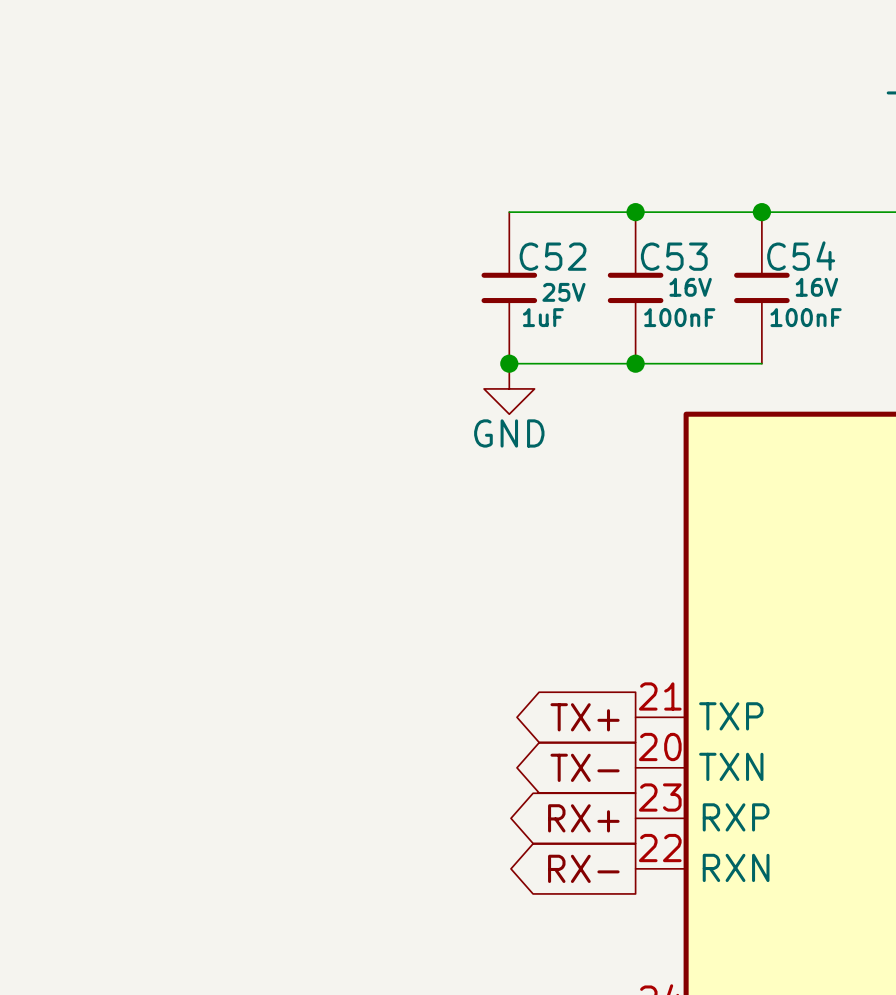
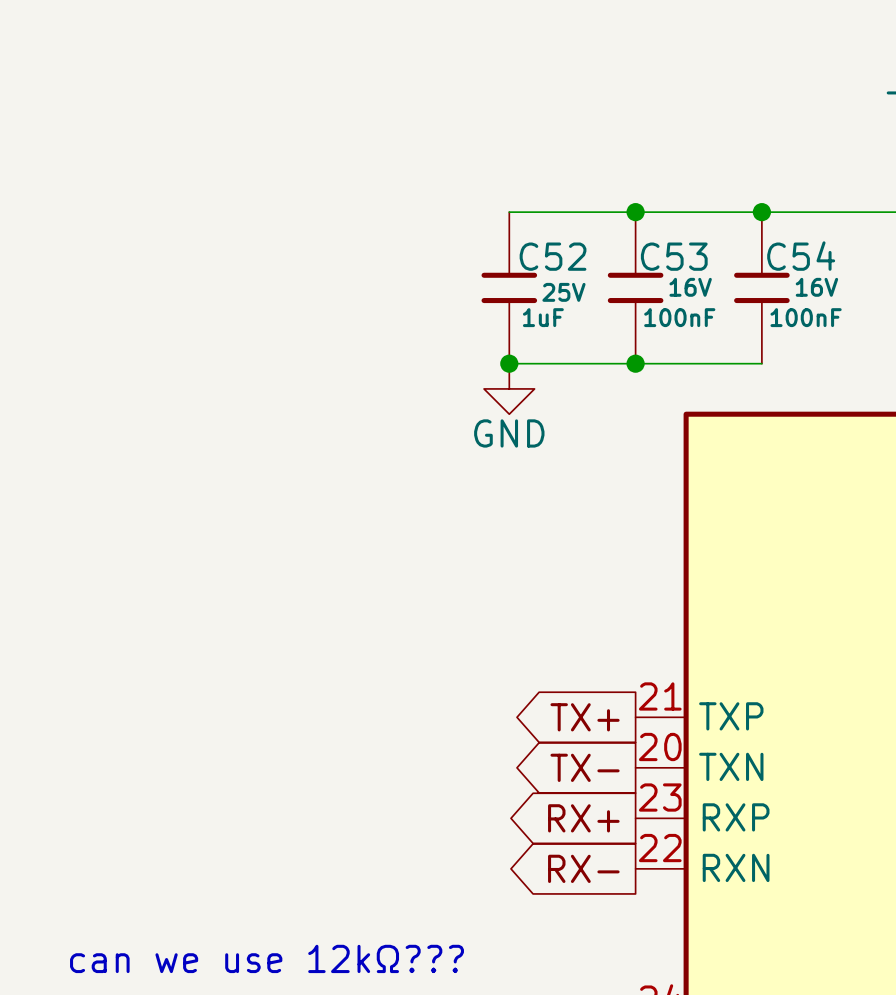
text: none -> can we use 12kΩ??? (267, 958)

